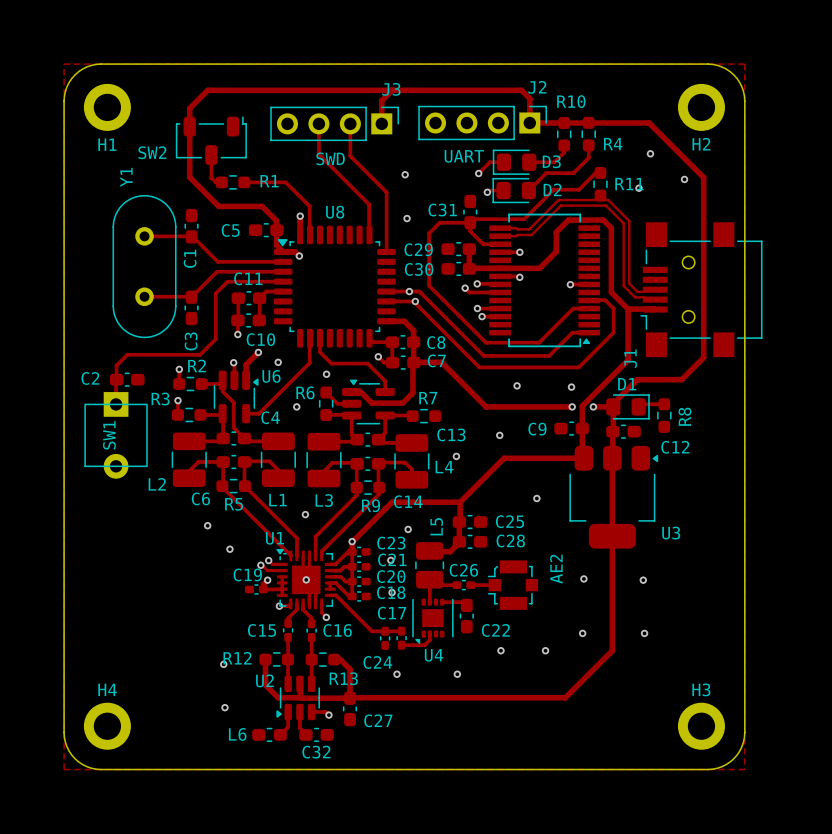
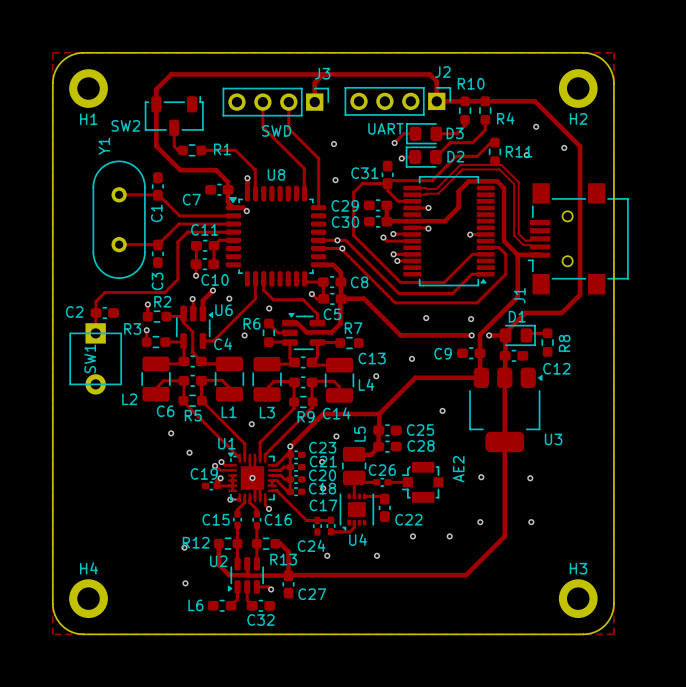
C5 name: C5 (230, 230) -> C7 (191, 199)
C7 name: C7 (436, 360) -> C5 (332, 314)

